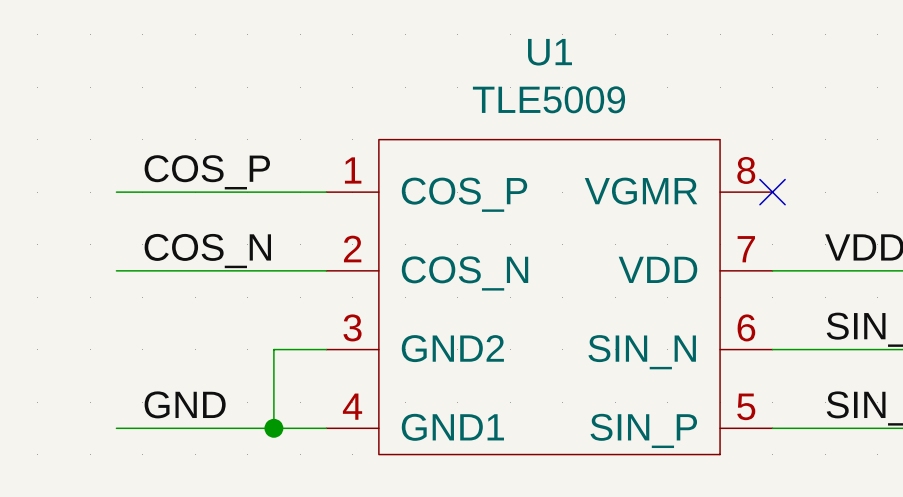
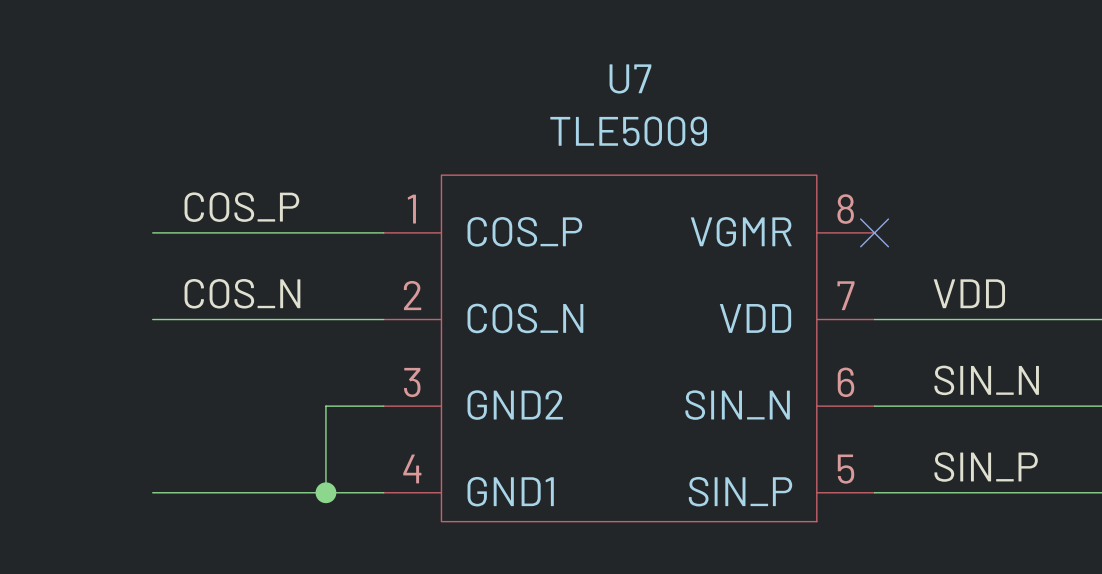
U1 name: U1 (550, 52) -> U7 (630, 78)
label: GND (185, 404) -> none

